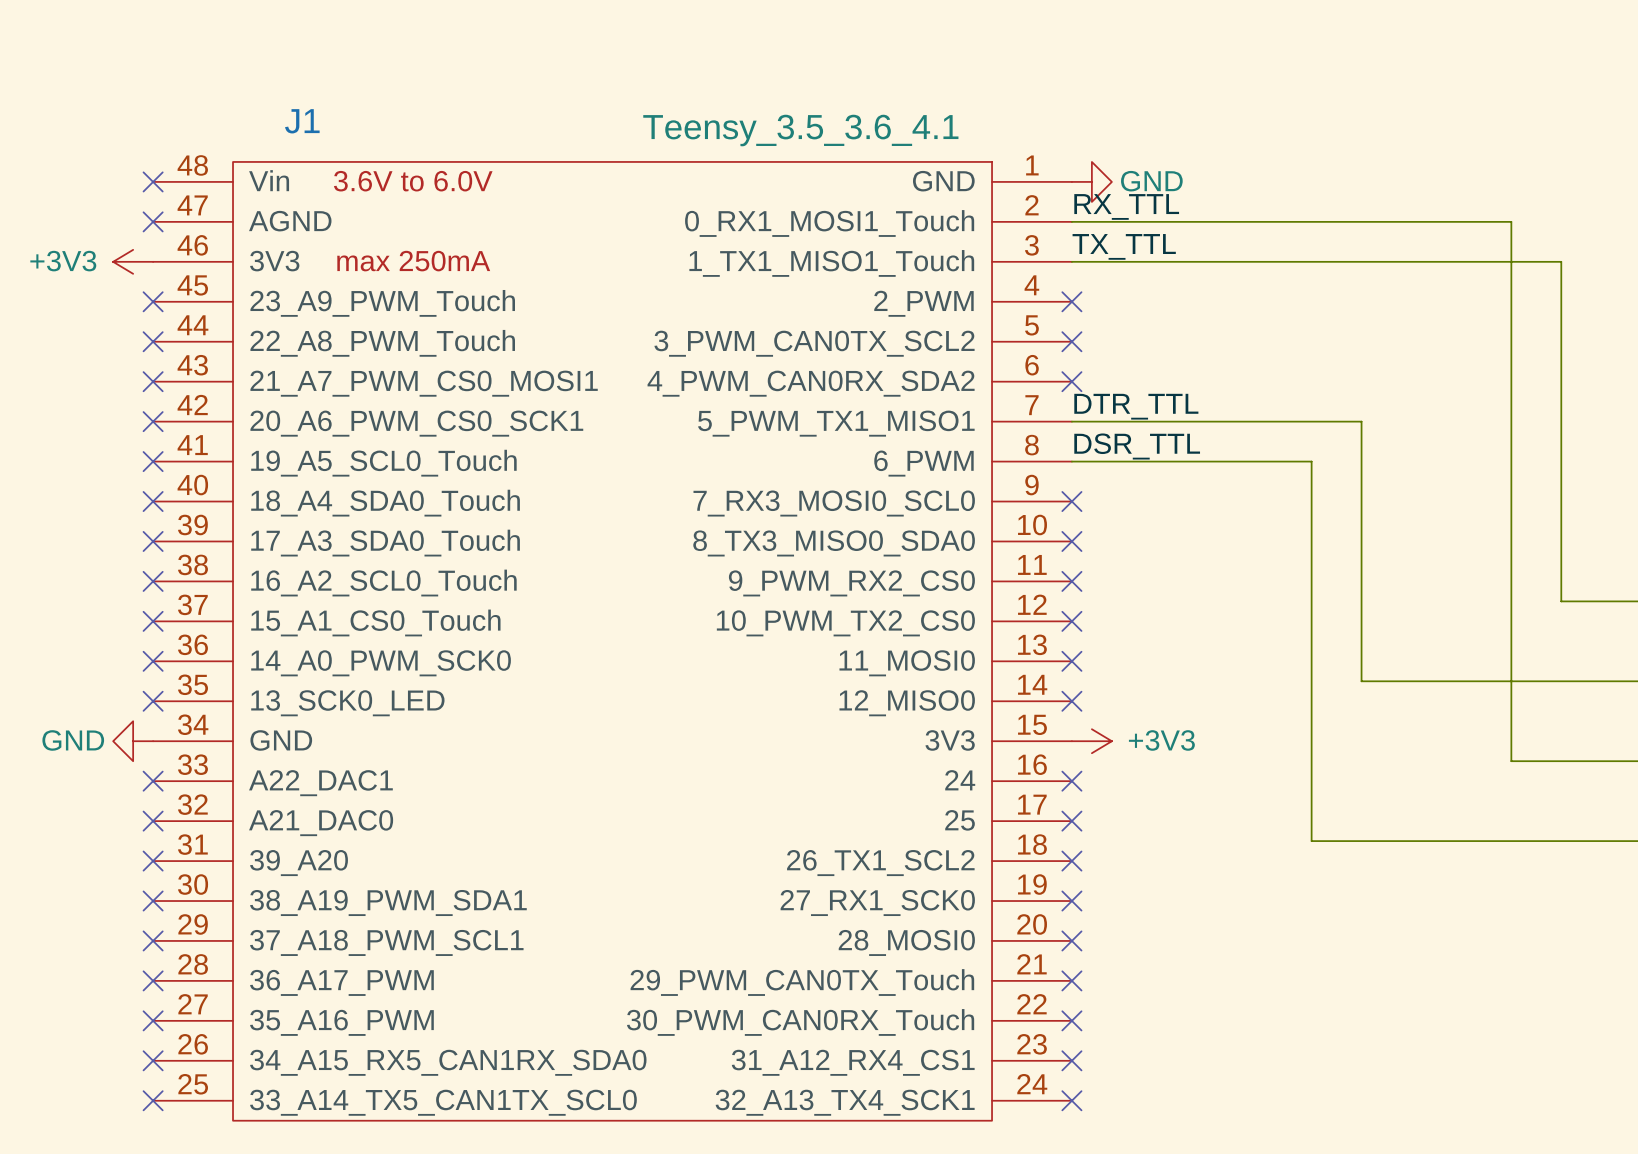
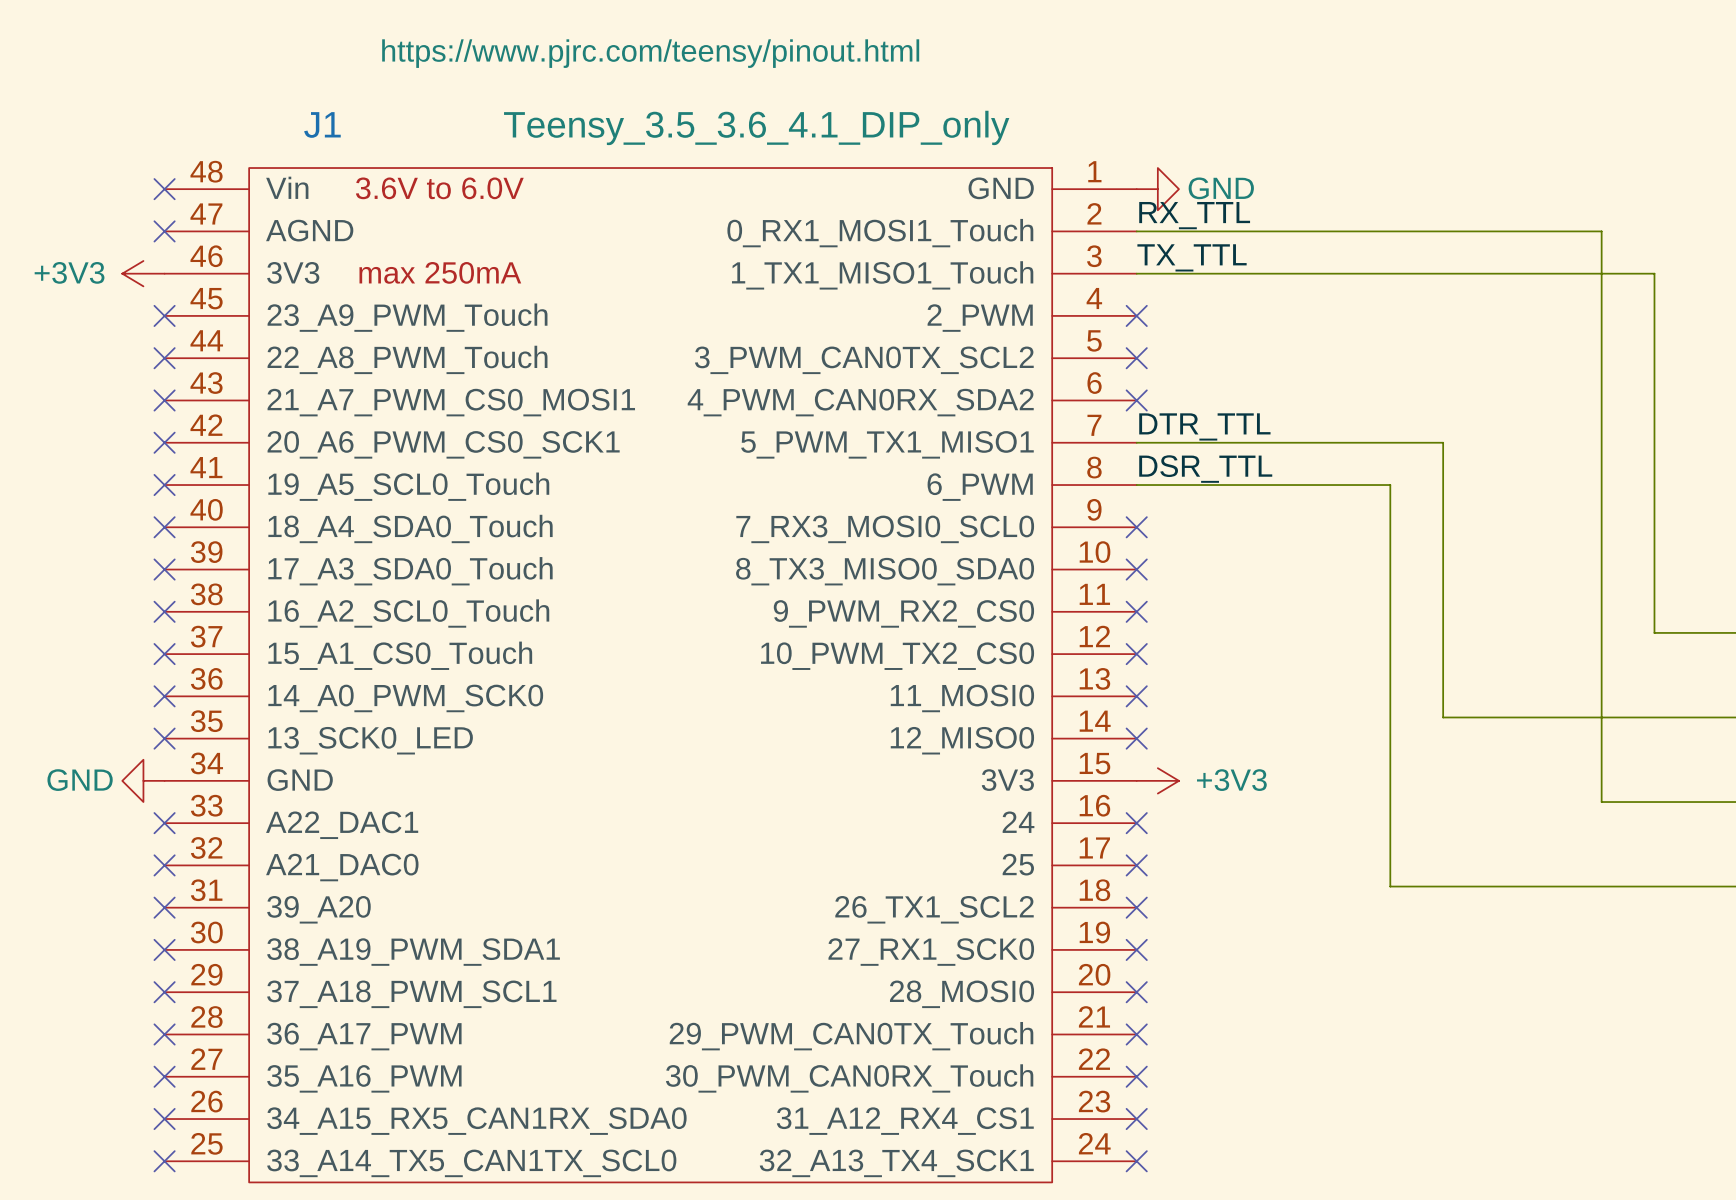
J1 text: none -> https://www.pjrc.com/teensy/pinout.html (650, 53)
J1 value: Teensy_3.5_3.6_4.1 (800, 130) -> Teensy_3.5_3.6_4.1_DIP_only (756, 127)

